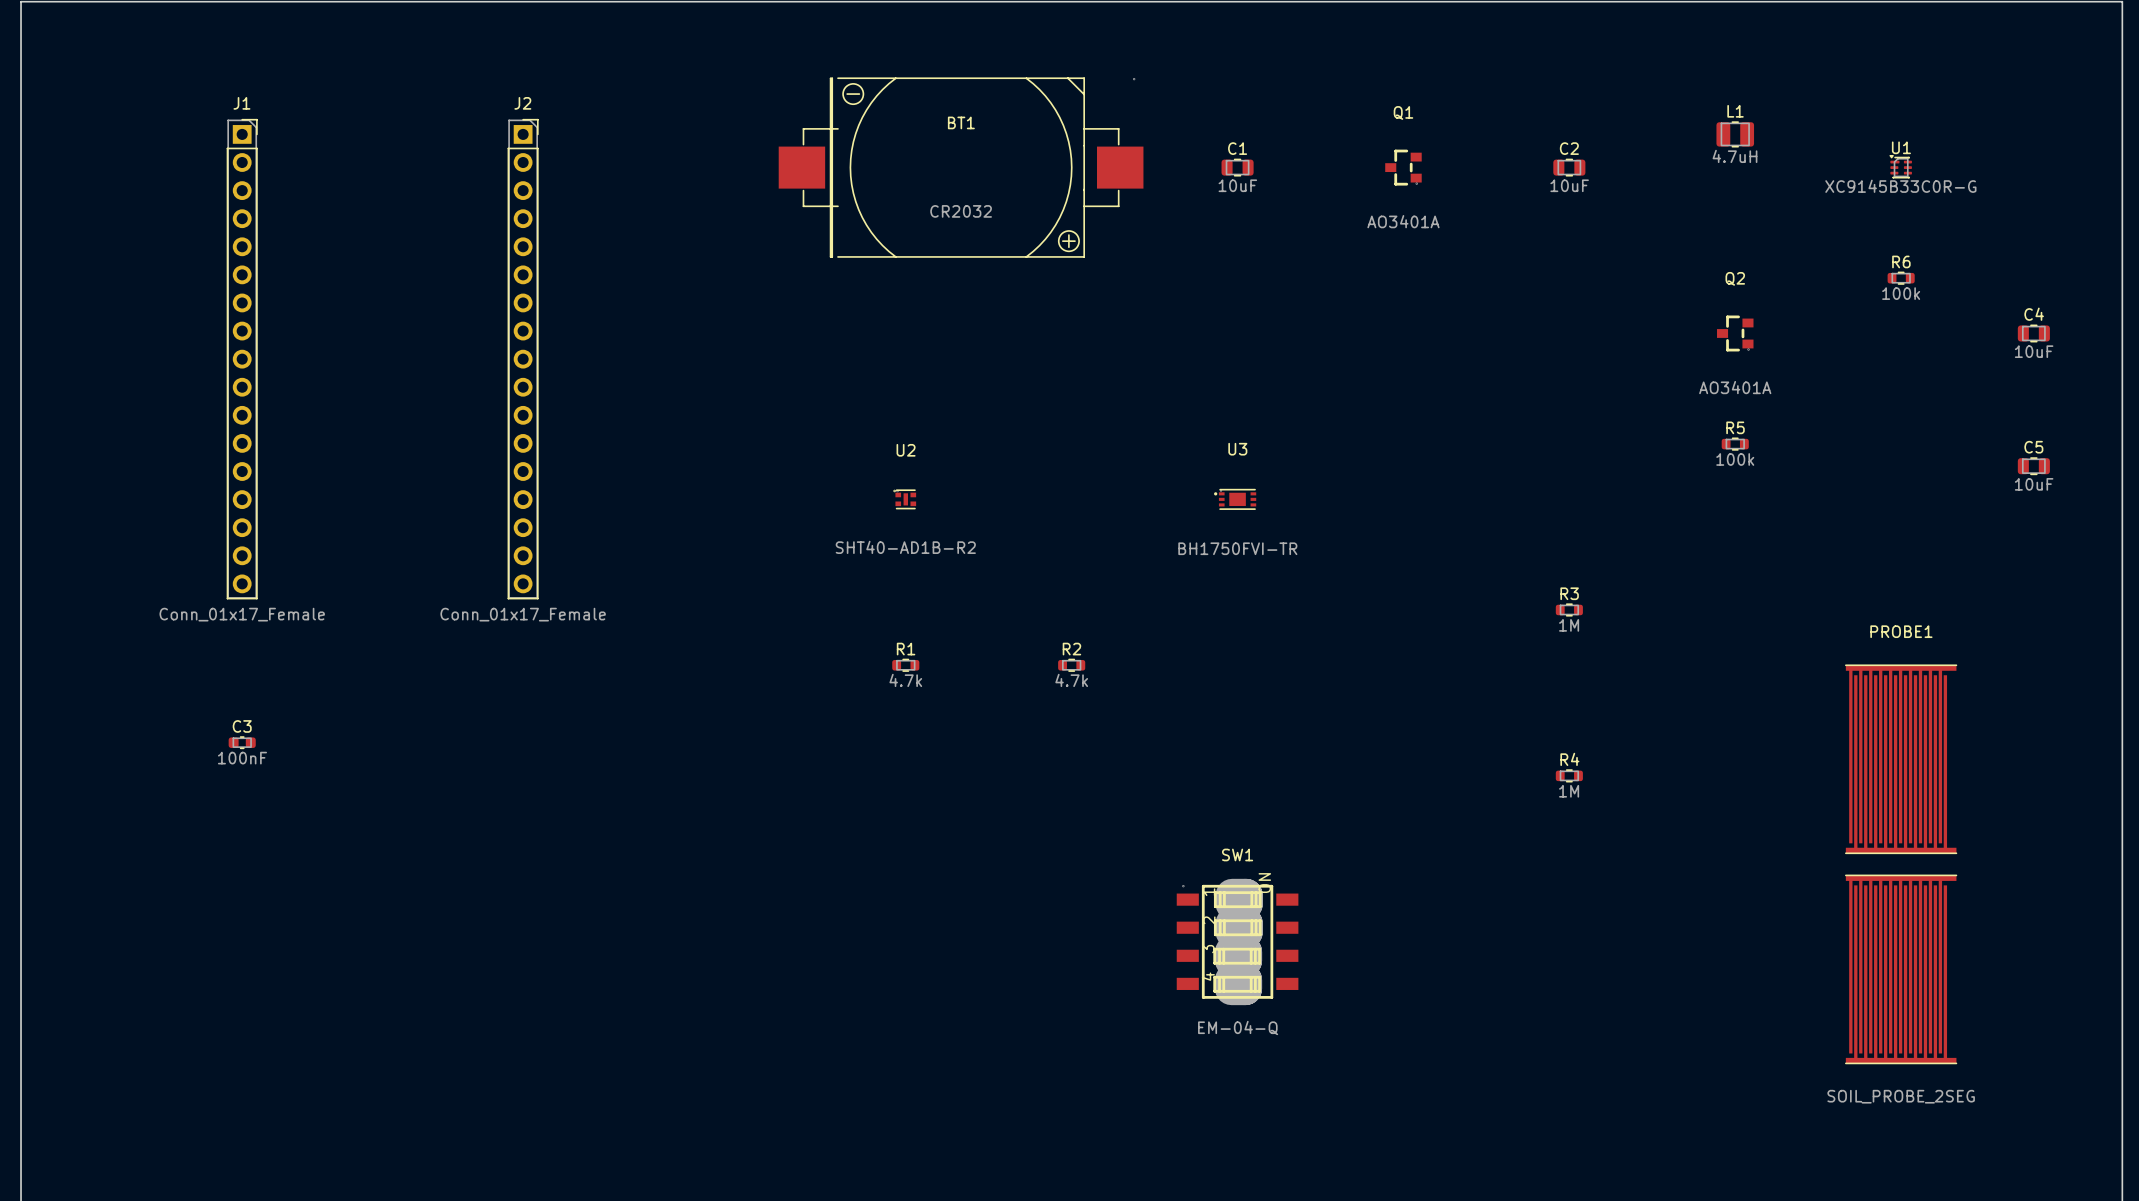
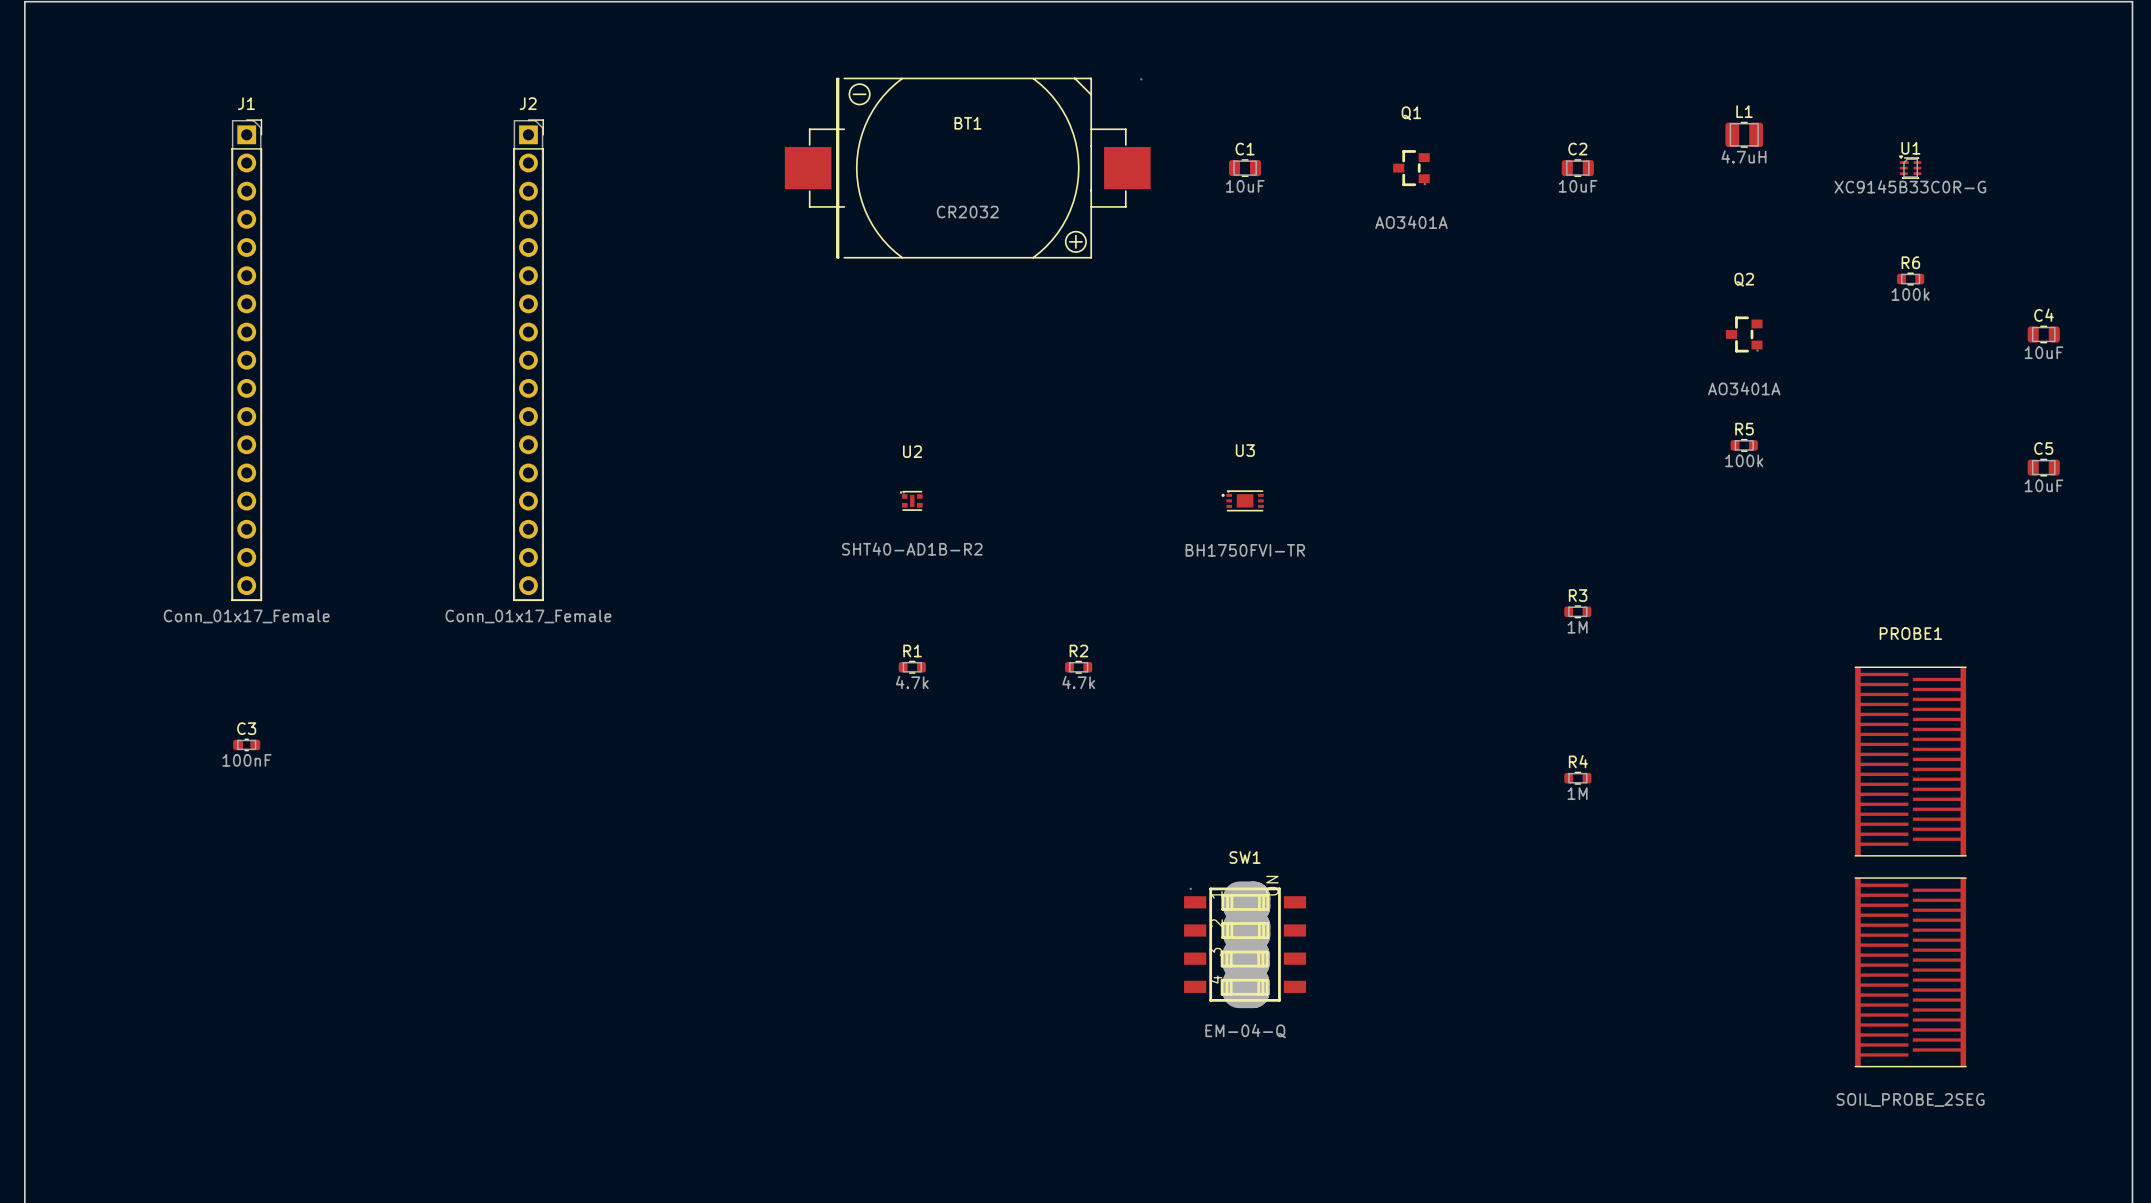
PROBE1 footprint: [1845, 664, 1958, 1064] -> [1854, 666, 1967, 1068]

